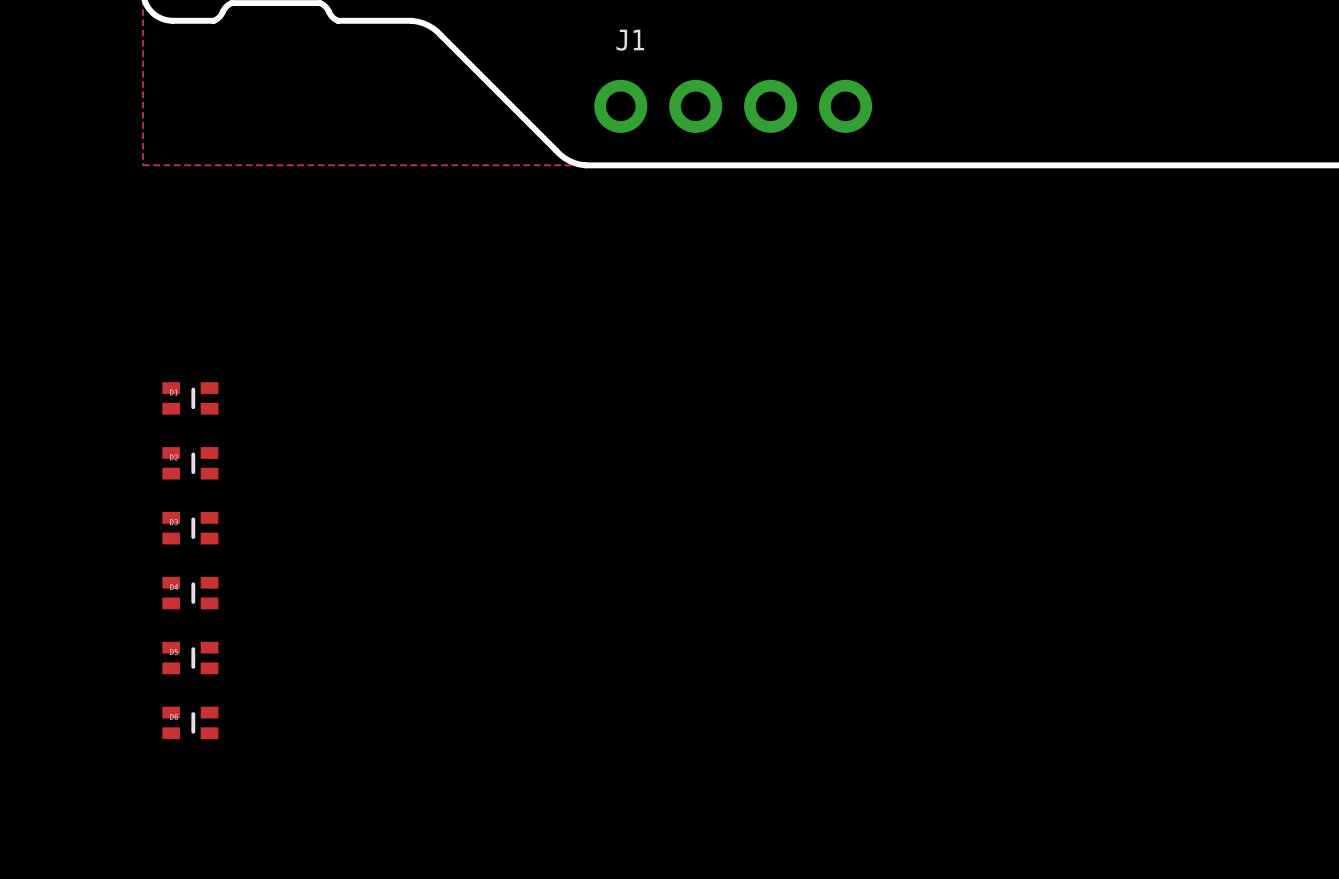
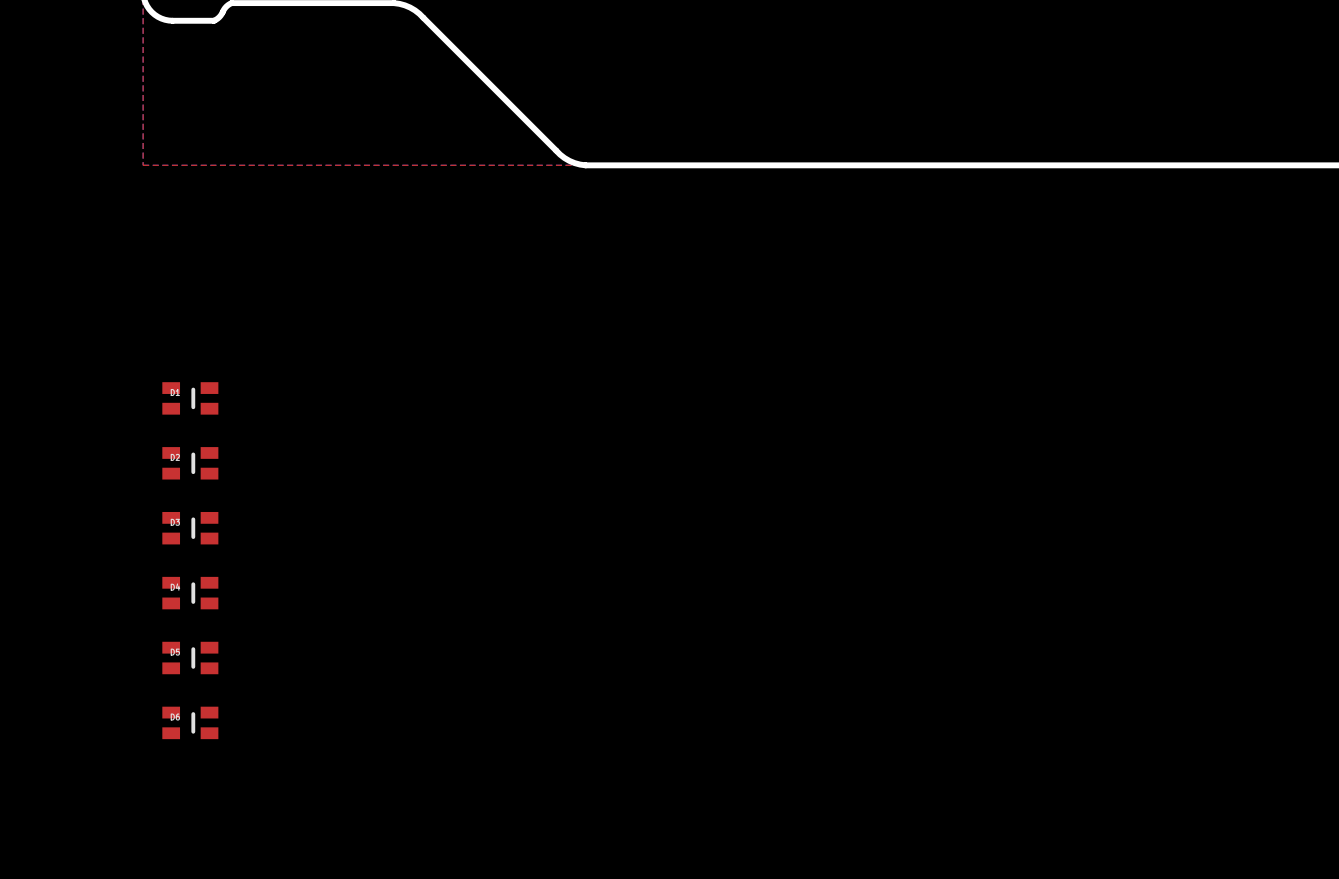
board edge: (320, 3) (337, 20) (417, 21) (427, 25) (441, 35) -> (320, 3) (399, 3) (414, 10) (441, 35)
J1: (733, 106) -> none

